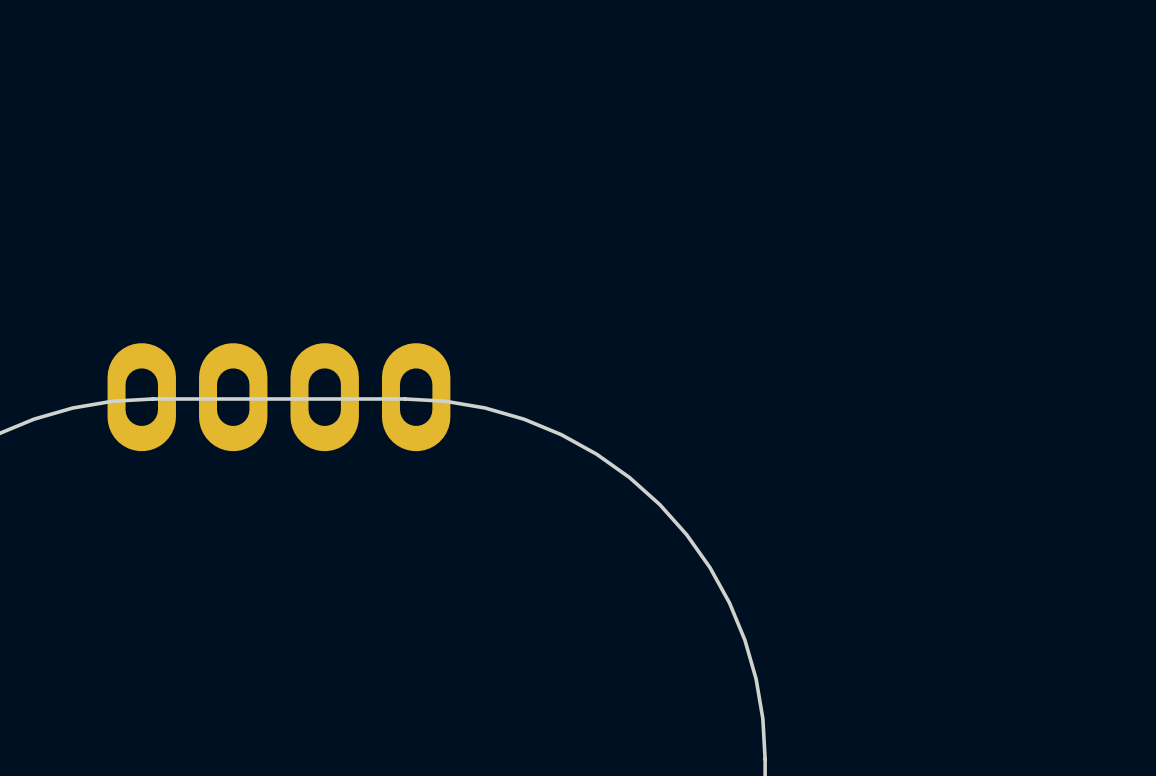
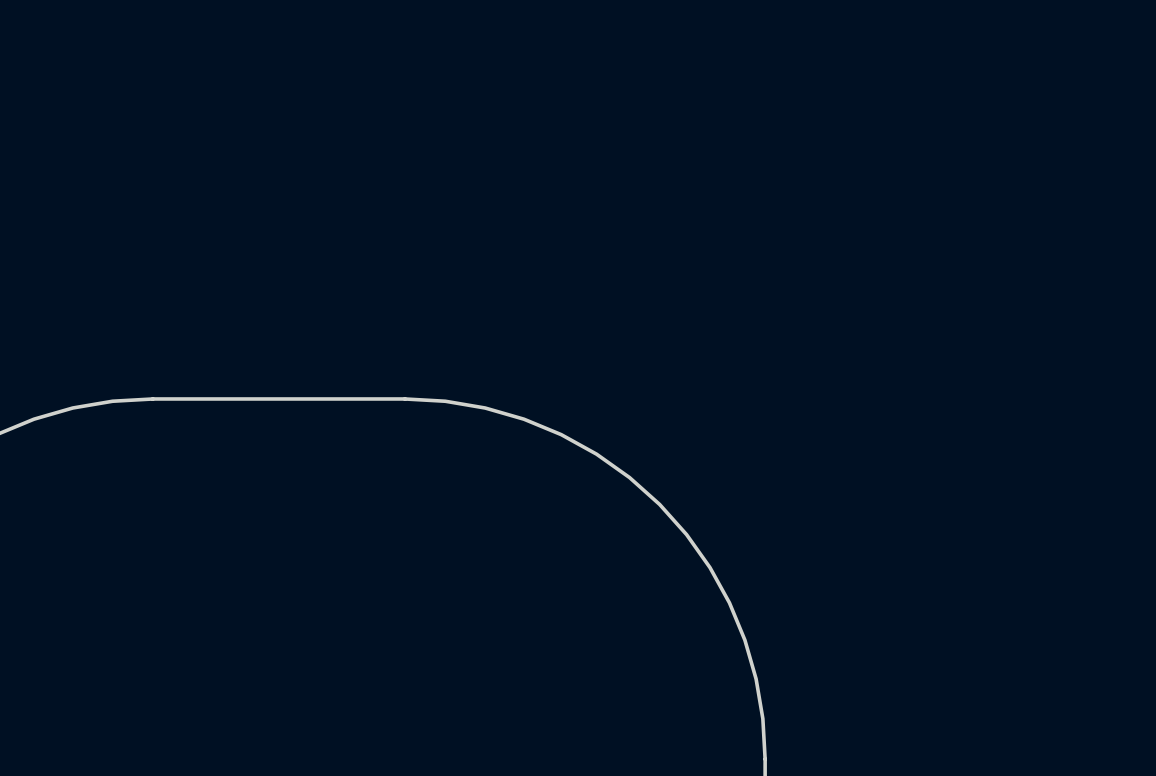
part: (278, 397) -> none

